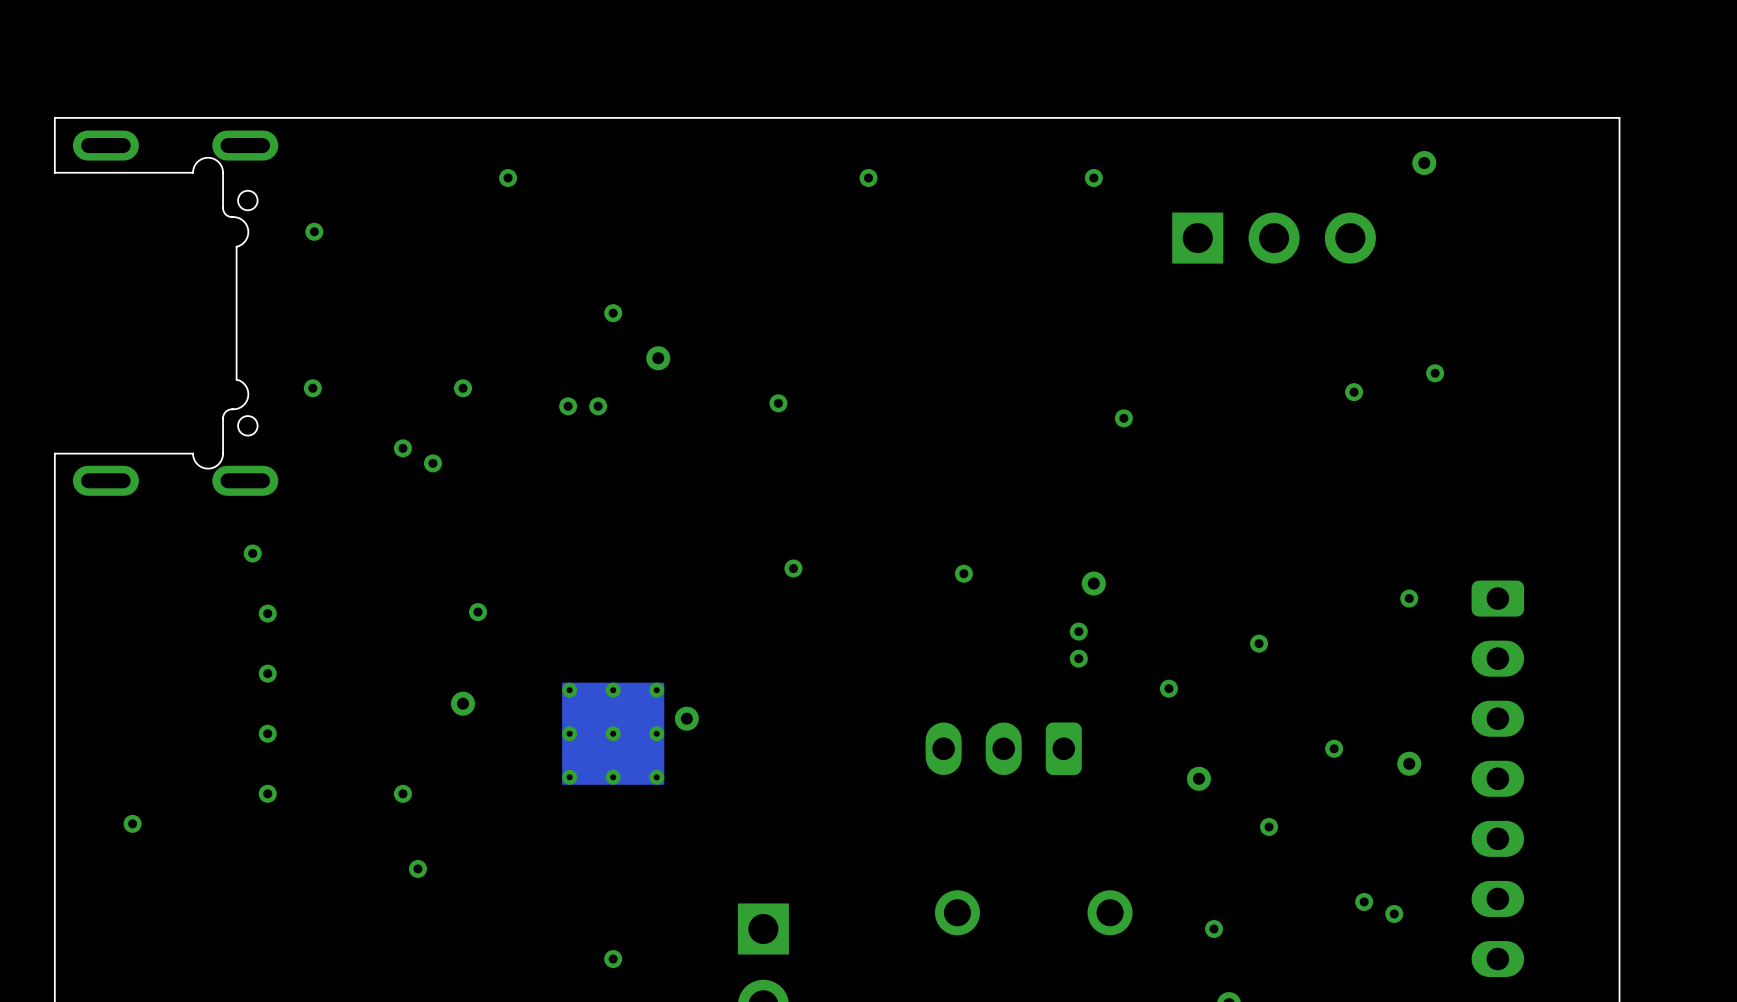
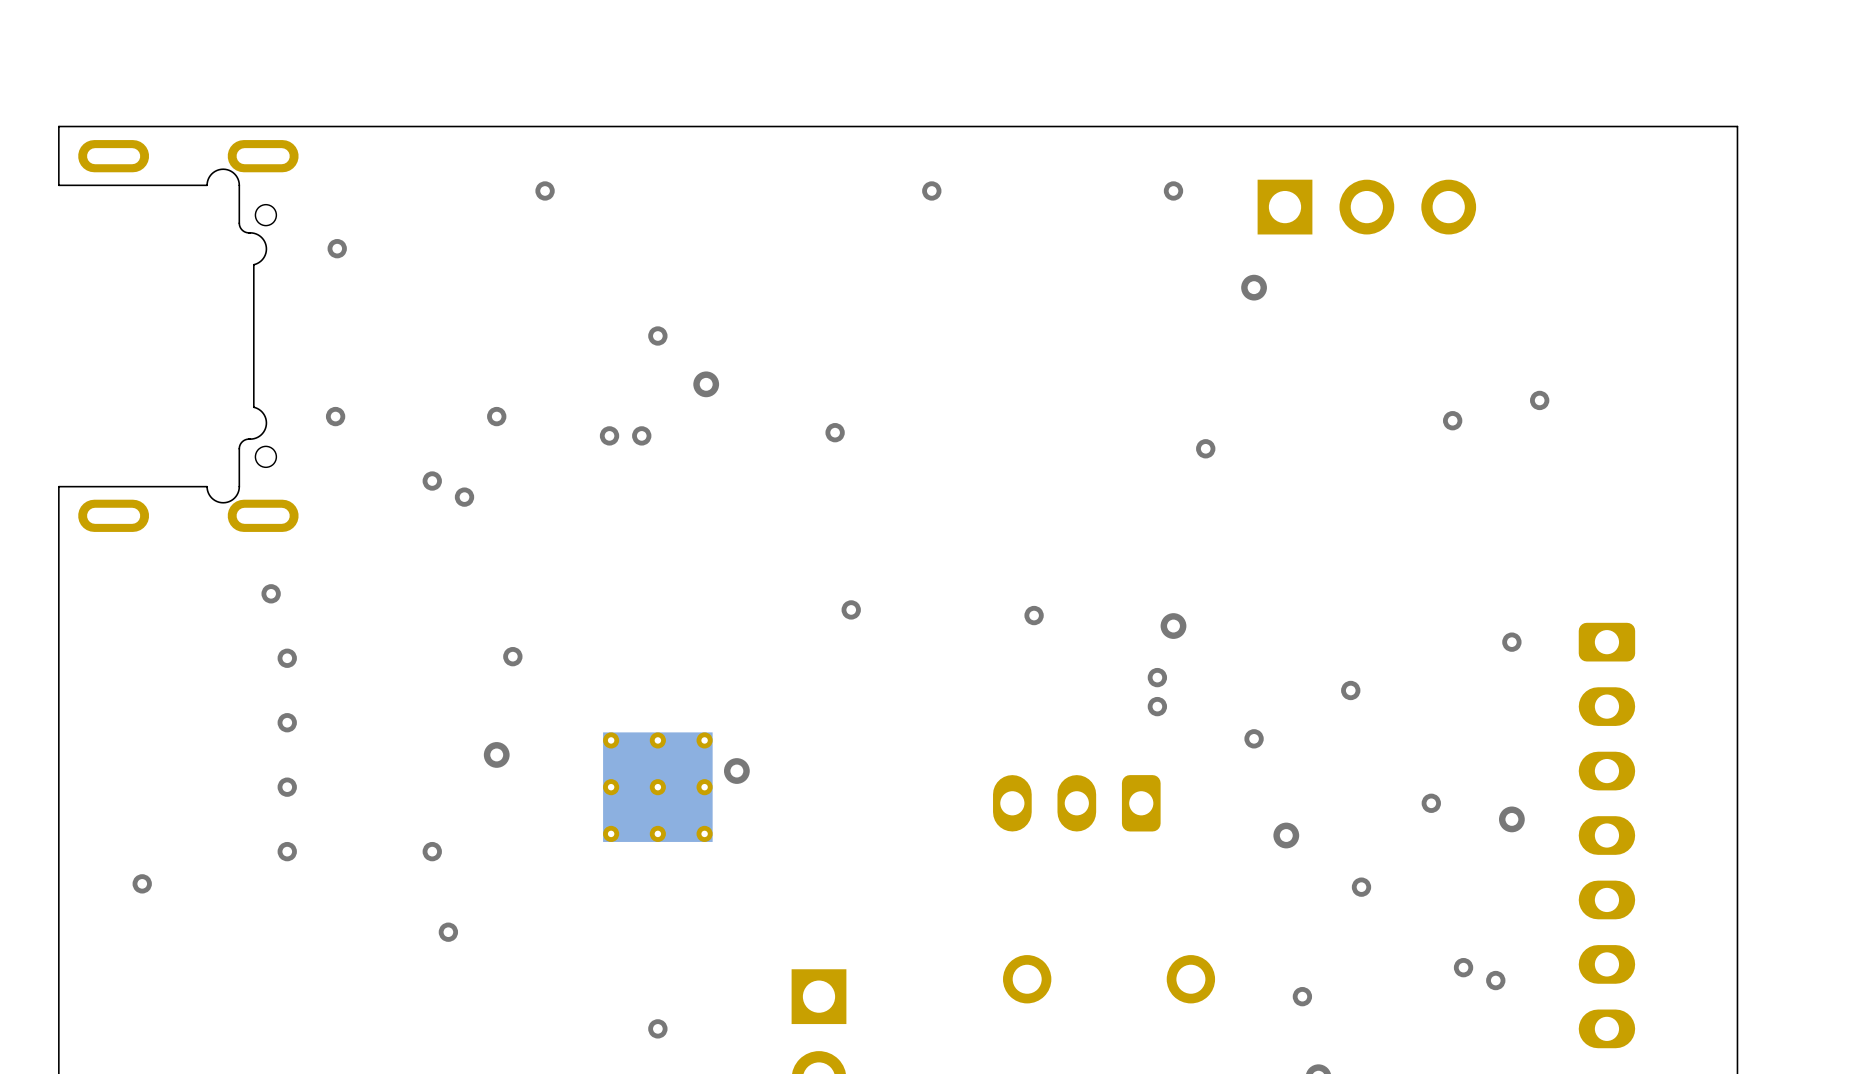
via: (1424, 162) -> none
part position: (1274, 238) -> (1366, 207)
via: none -> (1254, 287)

